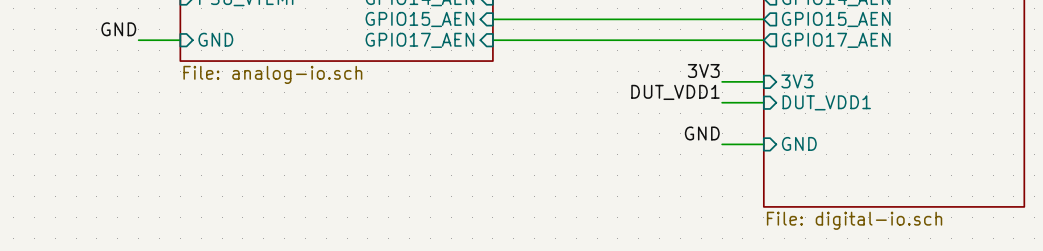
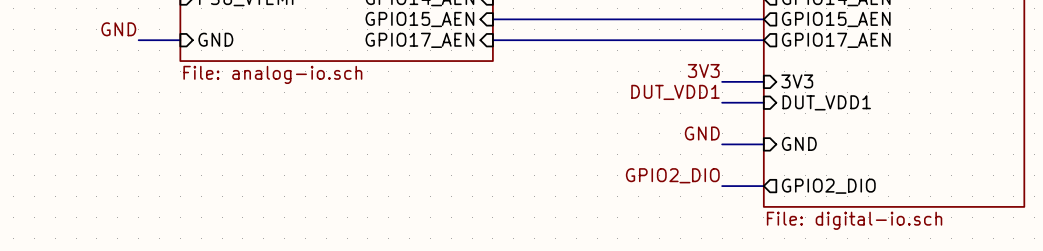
label: none -> GPIO2_DIO (672, 175)
wire: none -> (722, 186) (763, 186)
sheet pin: none -> GPIO2_DIO (828, 186)

